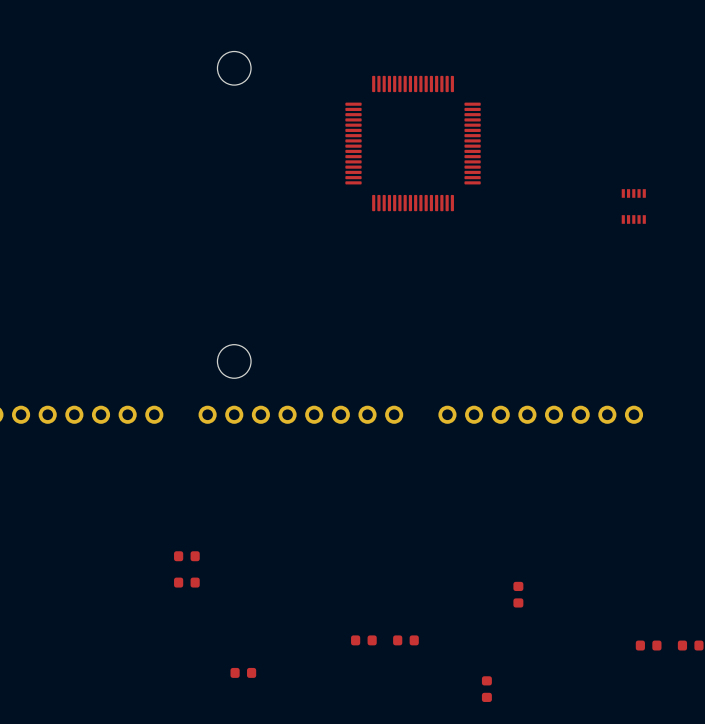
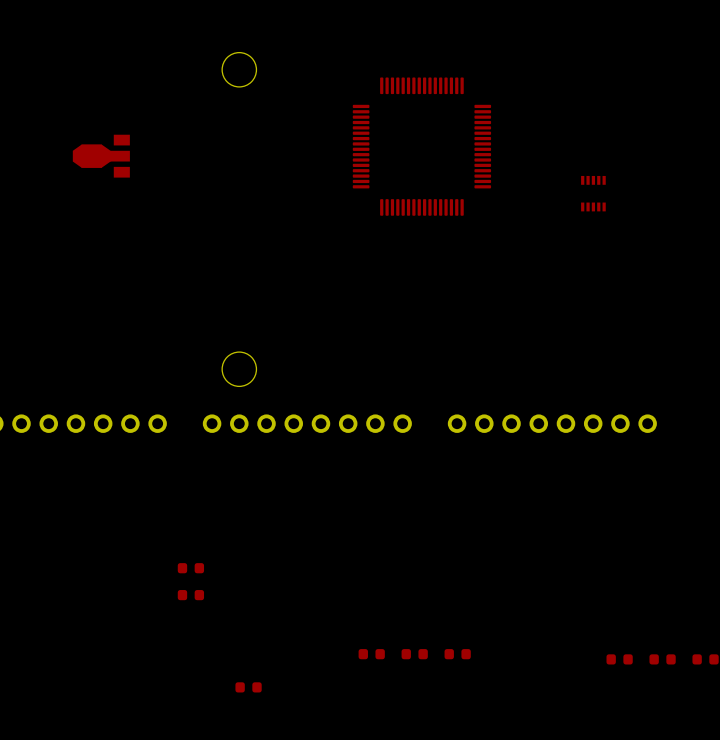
part: none -> (101, 156)
part position: (633, 206) -> (593, 193)
part: (518, 594) -> none
part: none -> (457, 654)
part: none -> (619, 659)
part: (486, 689) -> none

